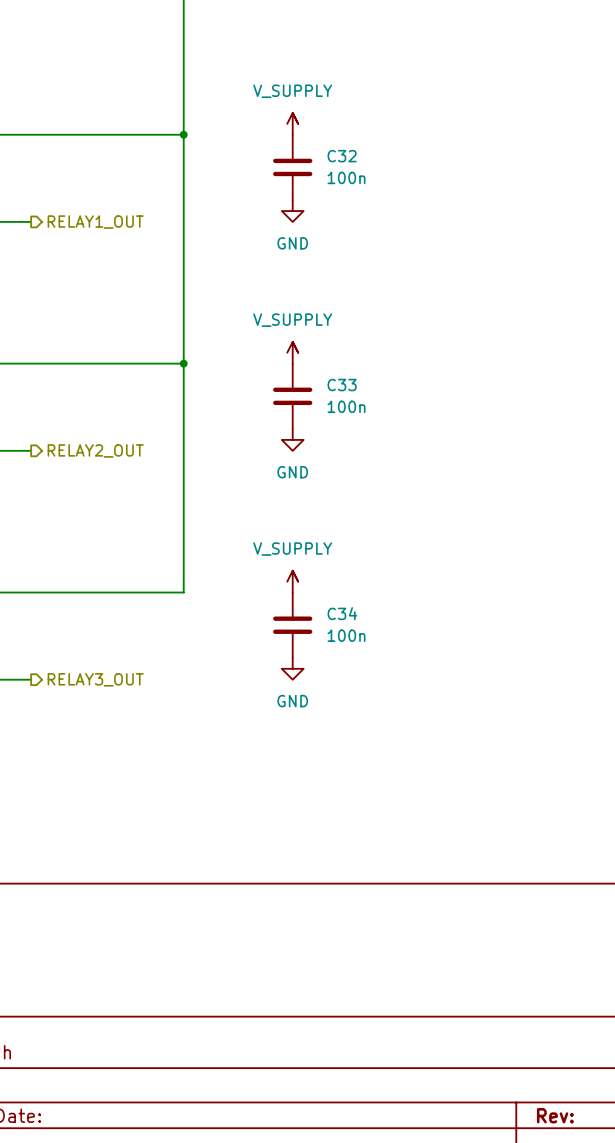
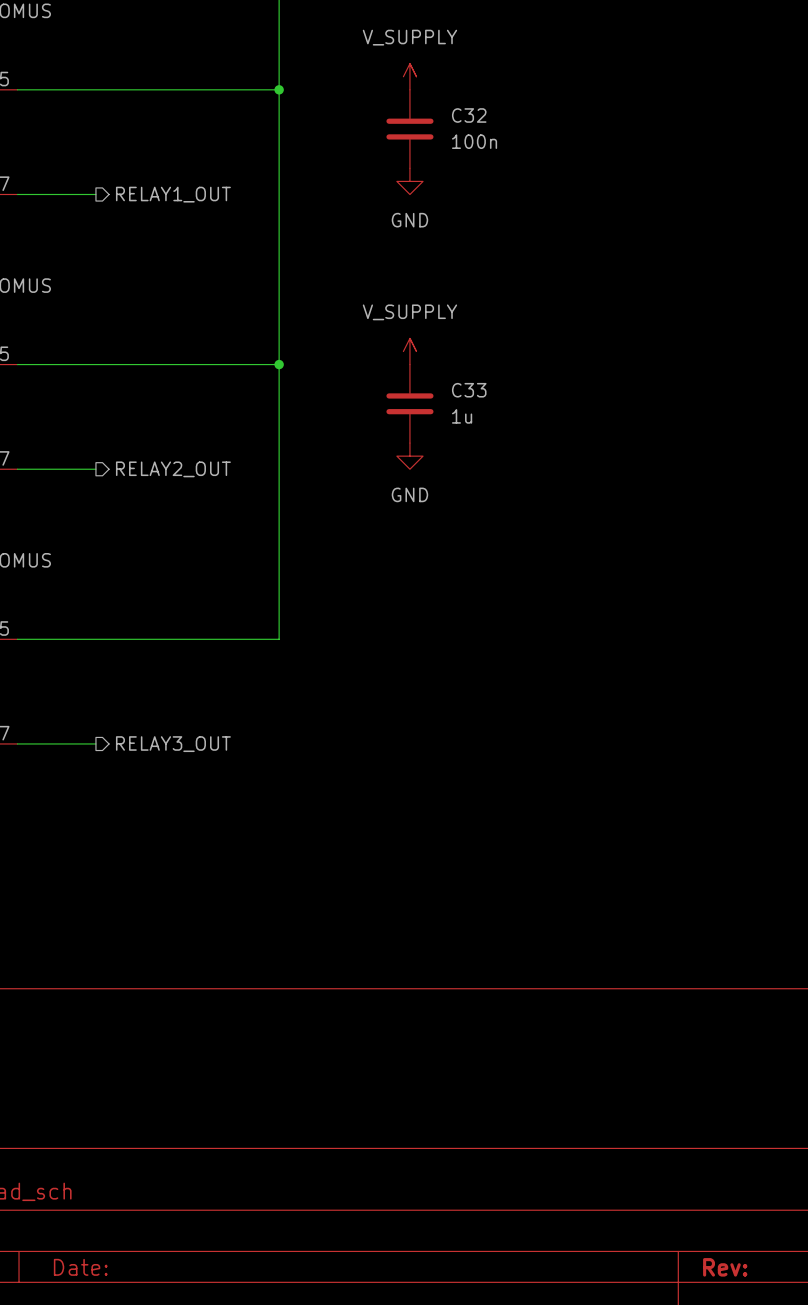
C33 value: 100n (346, 406) -> 1u (462, 416)
power symbol: V_SUPPLY (292, 581) -> none
C34: 100n (292, 625) -> none
power symbol: GND (292, 668) -> none

